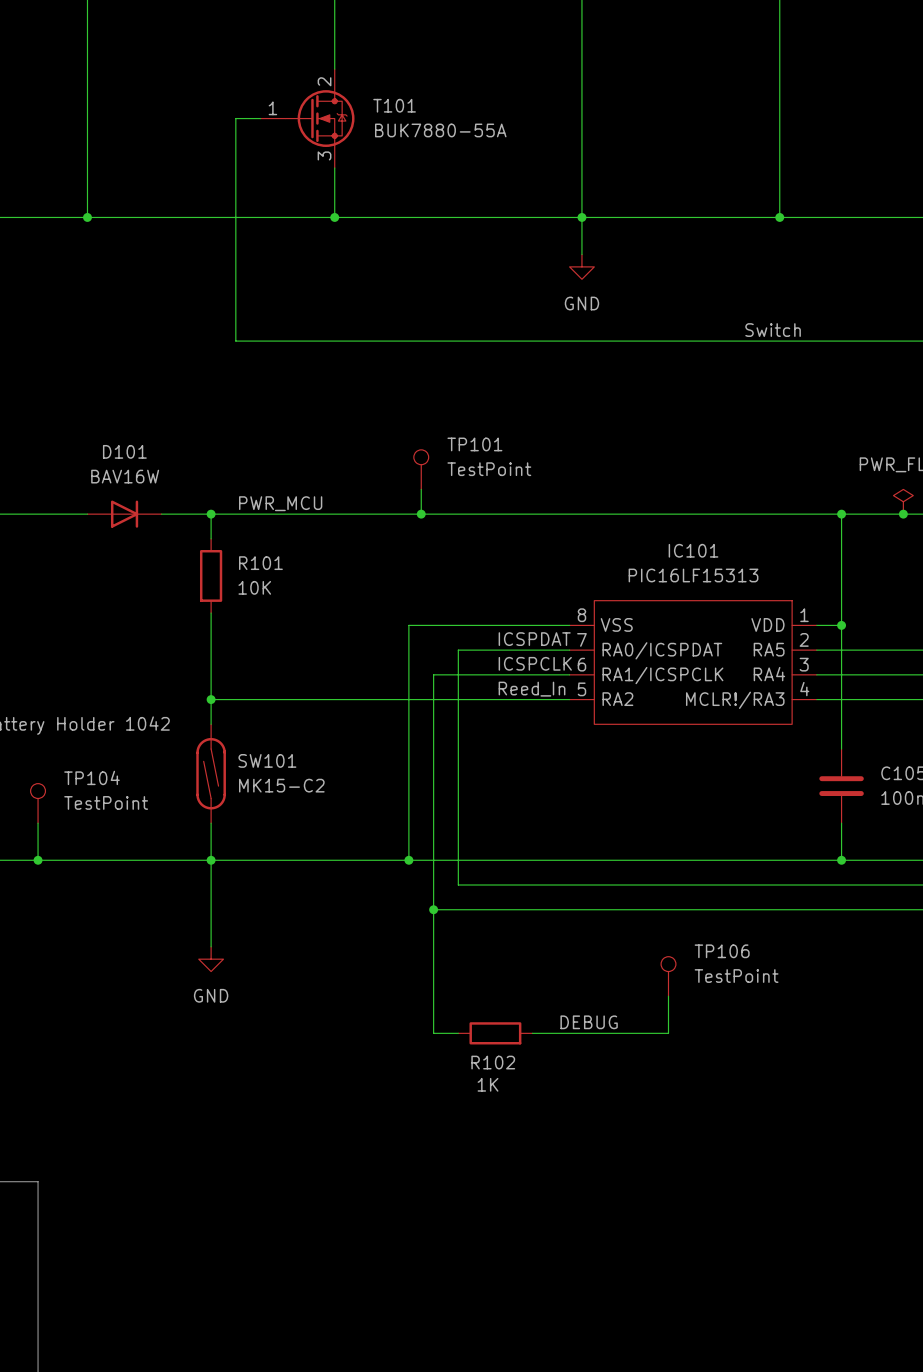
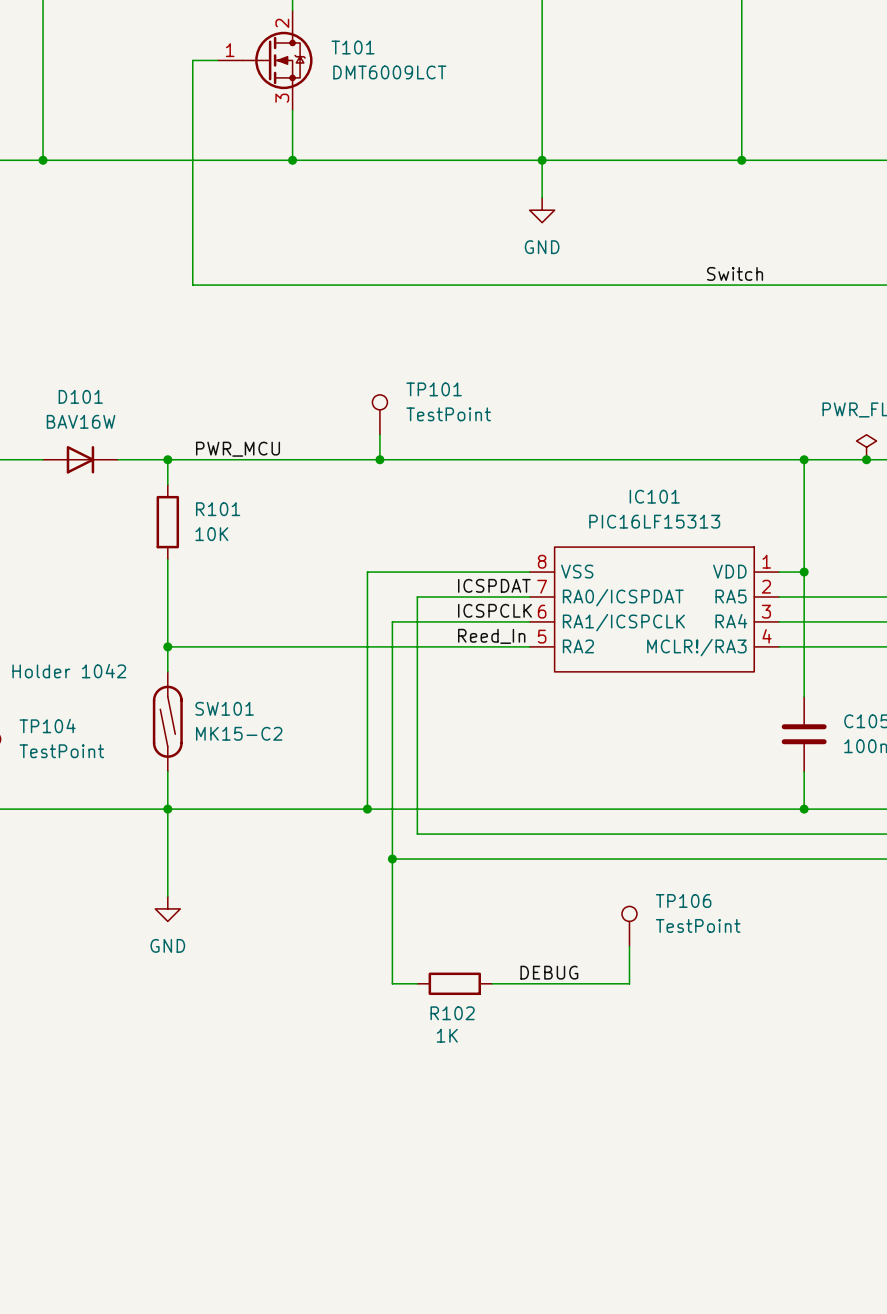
T101 value: BUK7880-55A (440, 130) -> DMT6009LCT (389, 72)

